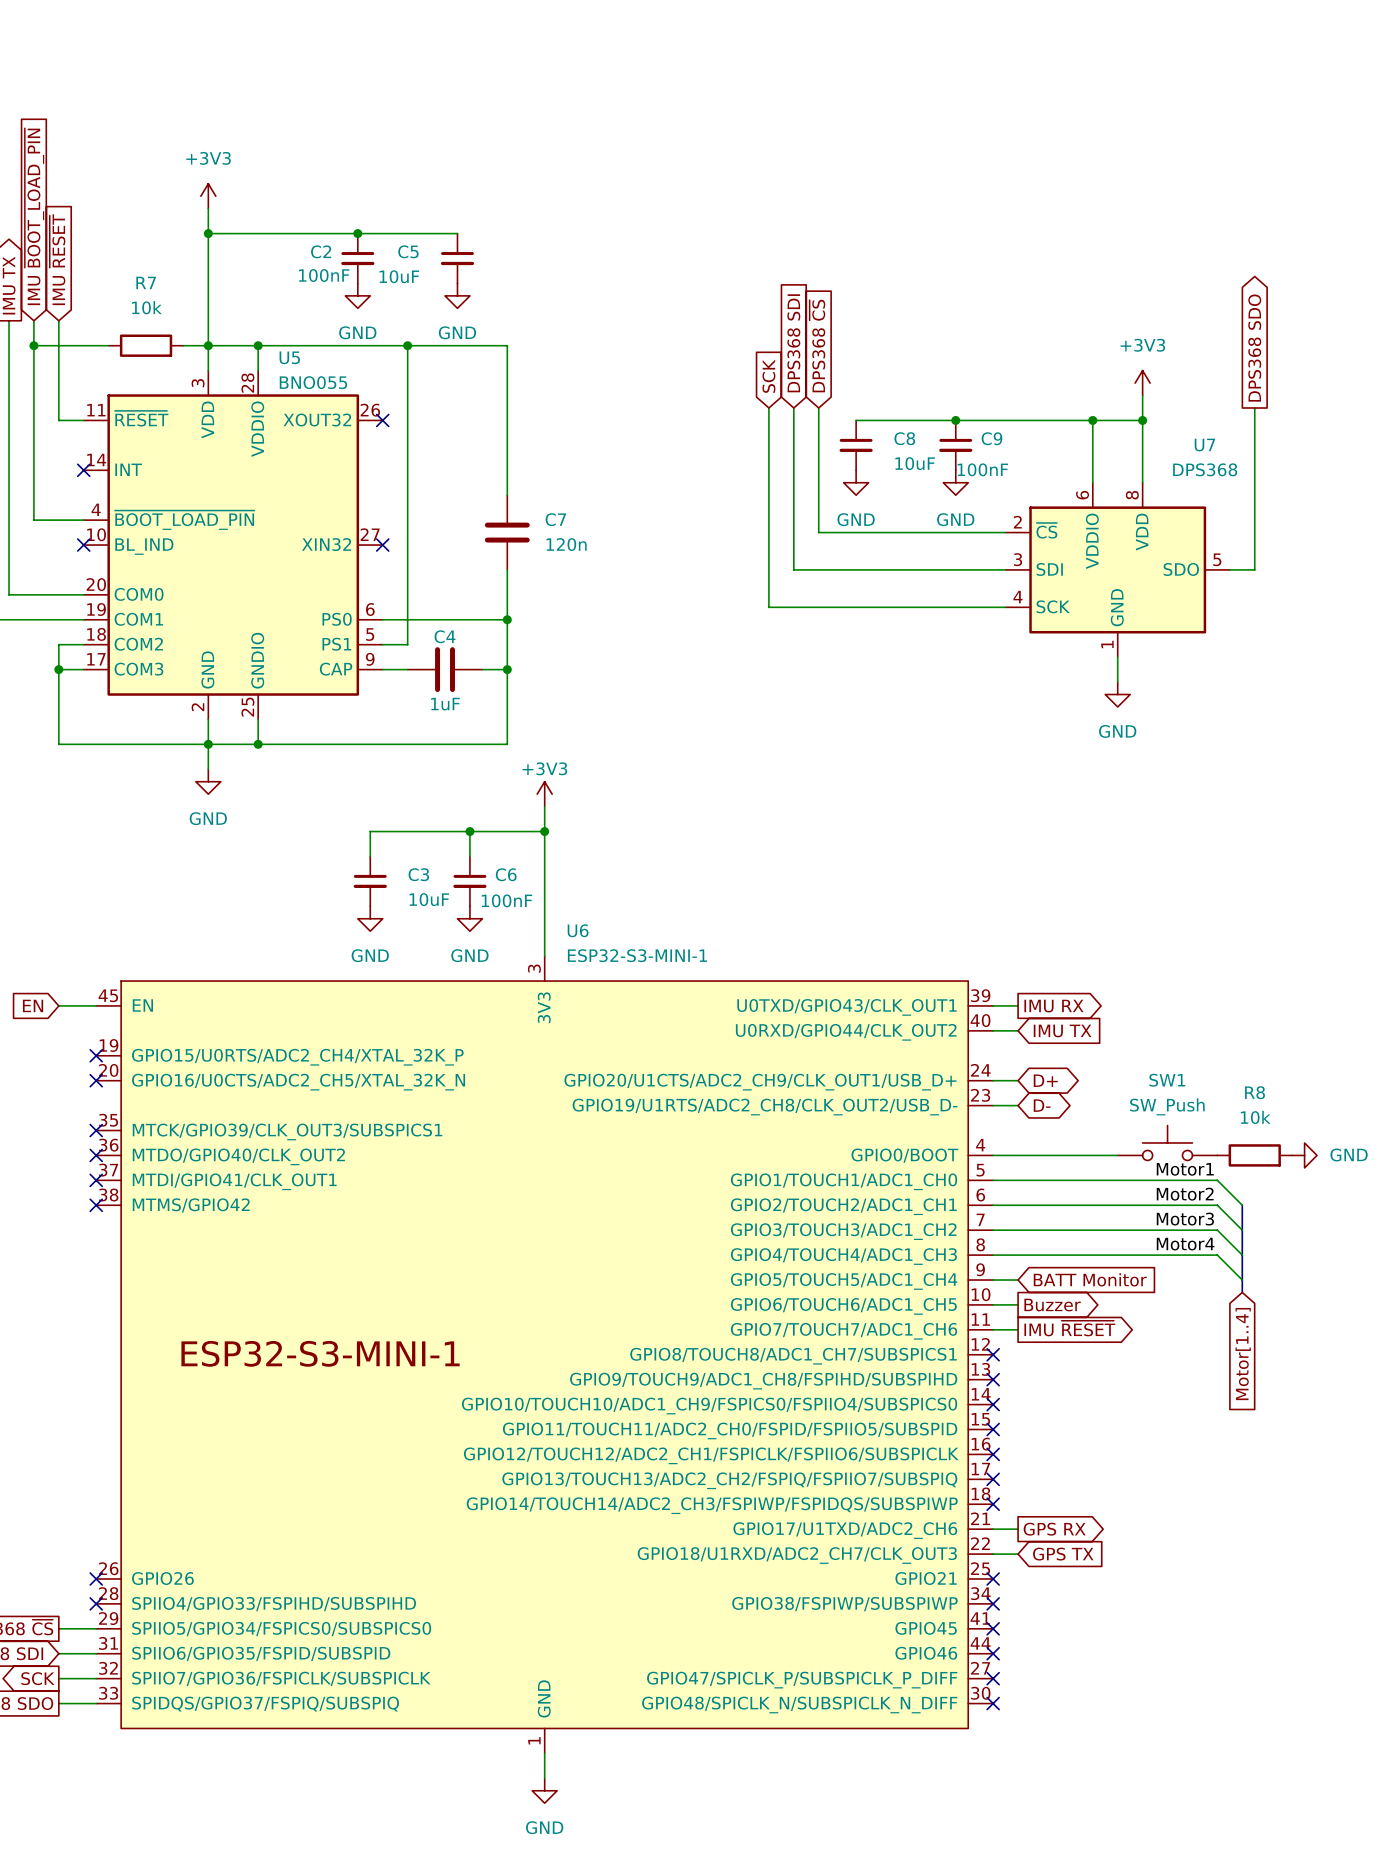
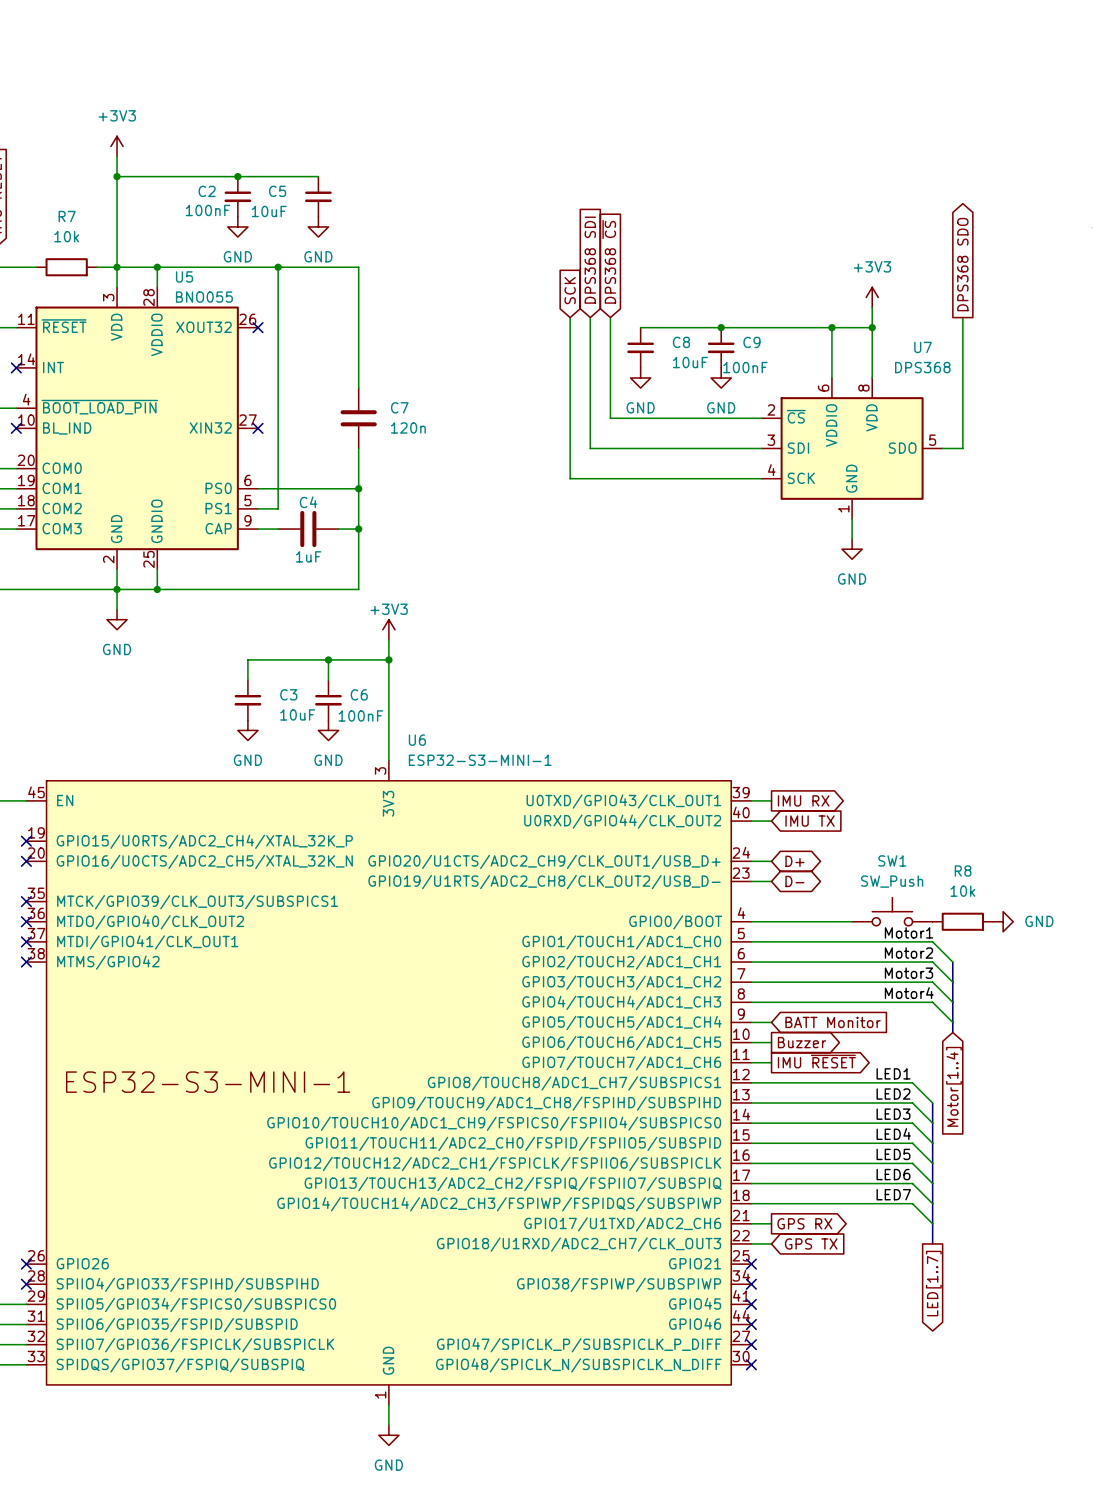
label: none -> LED1 (893, 1073)
wire: none -> (751, 1082) (912, 1082) (932, 1103)
no-connect mark: (993, 1354) -> none
label: none -> LED2 (893, 1094)
wire: none -> (751, 1103) (912, 1103) (932, 1123)
no-connect mark: (993, 1379) -> none
bus: none -> (932, 1103) (932, 1243)
label: none -> LED3 (893, 1114)
wire: none -> (751, 1123) (912, 1123) (932, 1143)
no-connect mark: (993, 1404) -> none
label: none -> LED4 (893, 1134)
wire: none -> (751, 1143) (912, 1143) (932, 1163)
no-connect mark: (993, 1429) -> none
label: none -> LED5 (893, 1154)
wire: none -> (751, 1163) (912, 1163) (932, 1183)
no-connect mark: (993, 1454) -> none
label: none -> LED6 (893, 1174)
wire: none -> (751, 1183) (912, 1183) (932, 1203)
no-connect mark: (993, 1479) -> none
label: none -> LED7 (893, 1194)
wire: none -> (751, 1203) (912, 1203) (932, 1223)
no-connect mark: (993, 1504) -> none
global label: none -> LED[1..7] (933, 1283)

